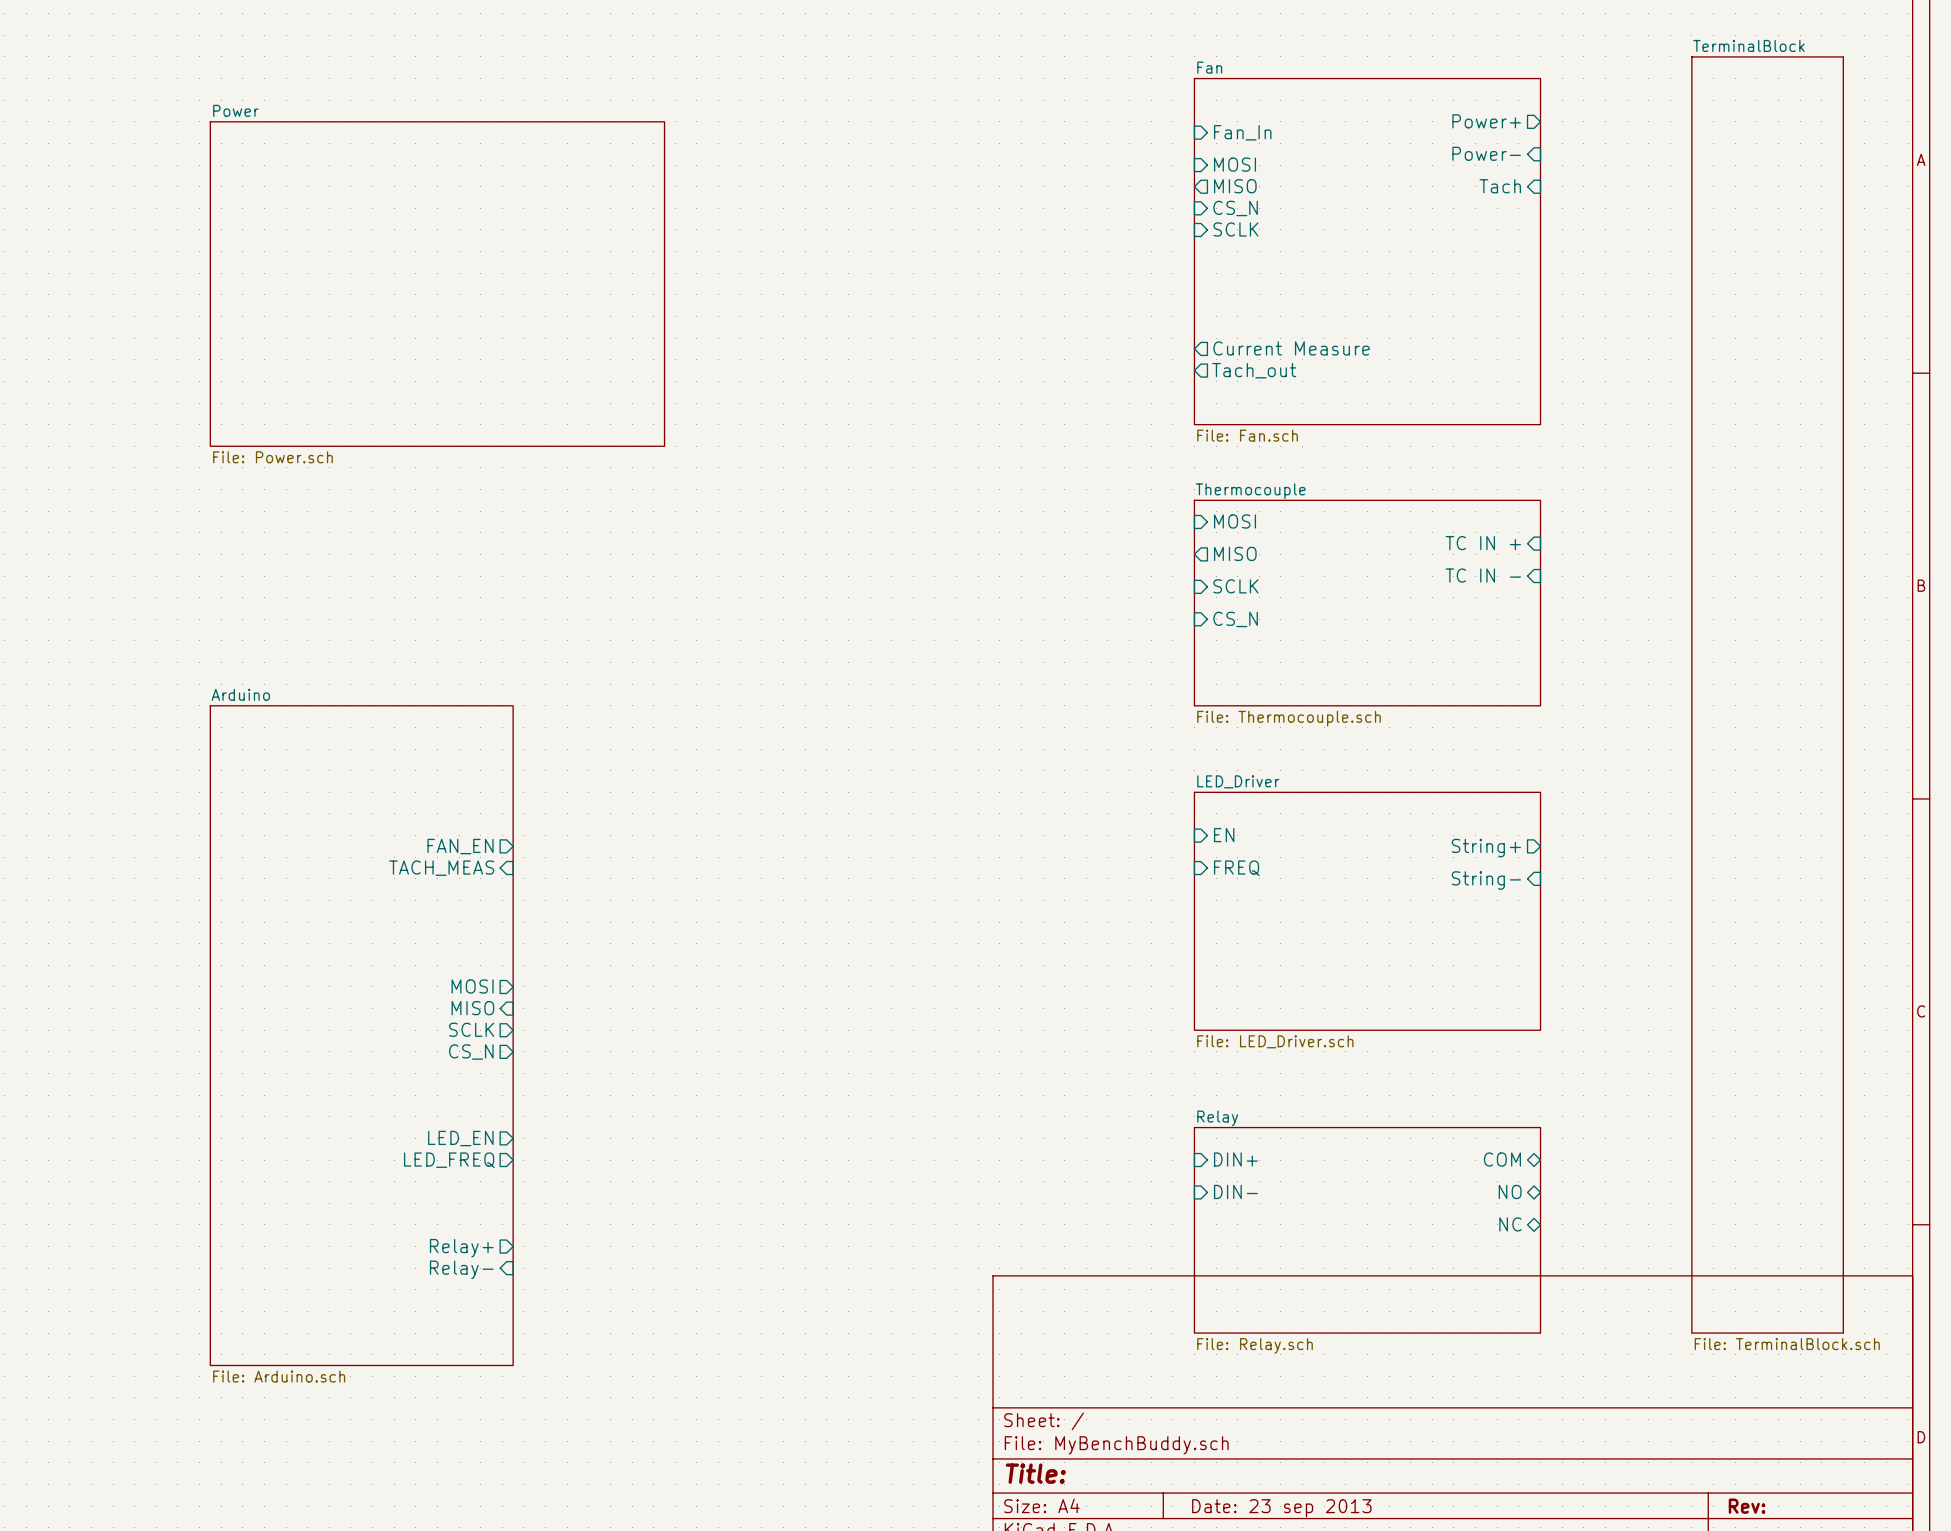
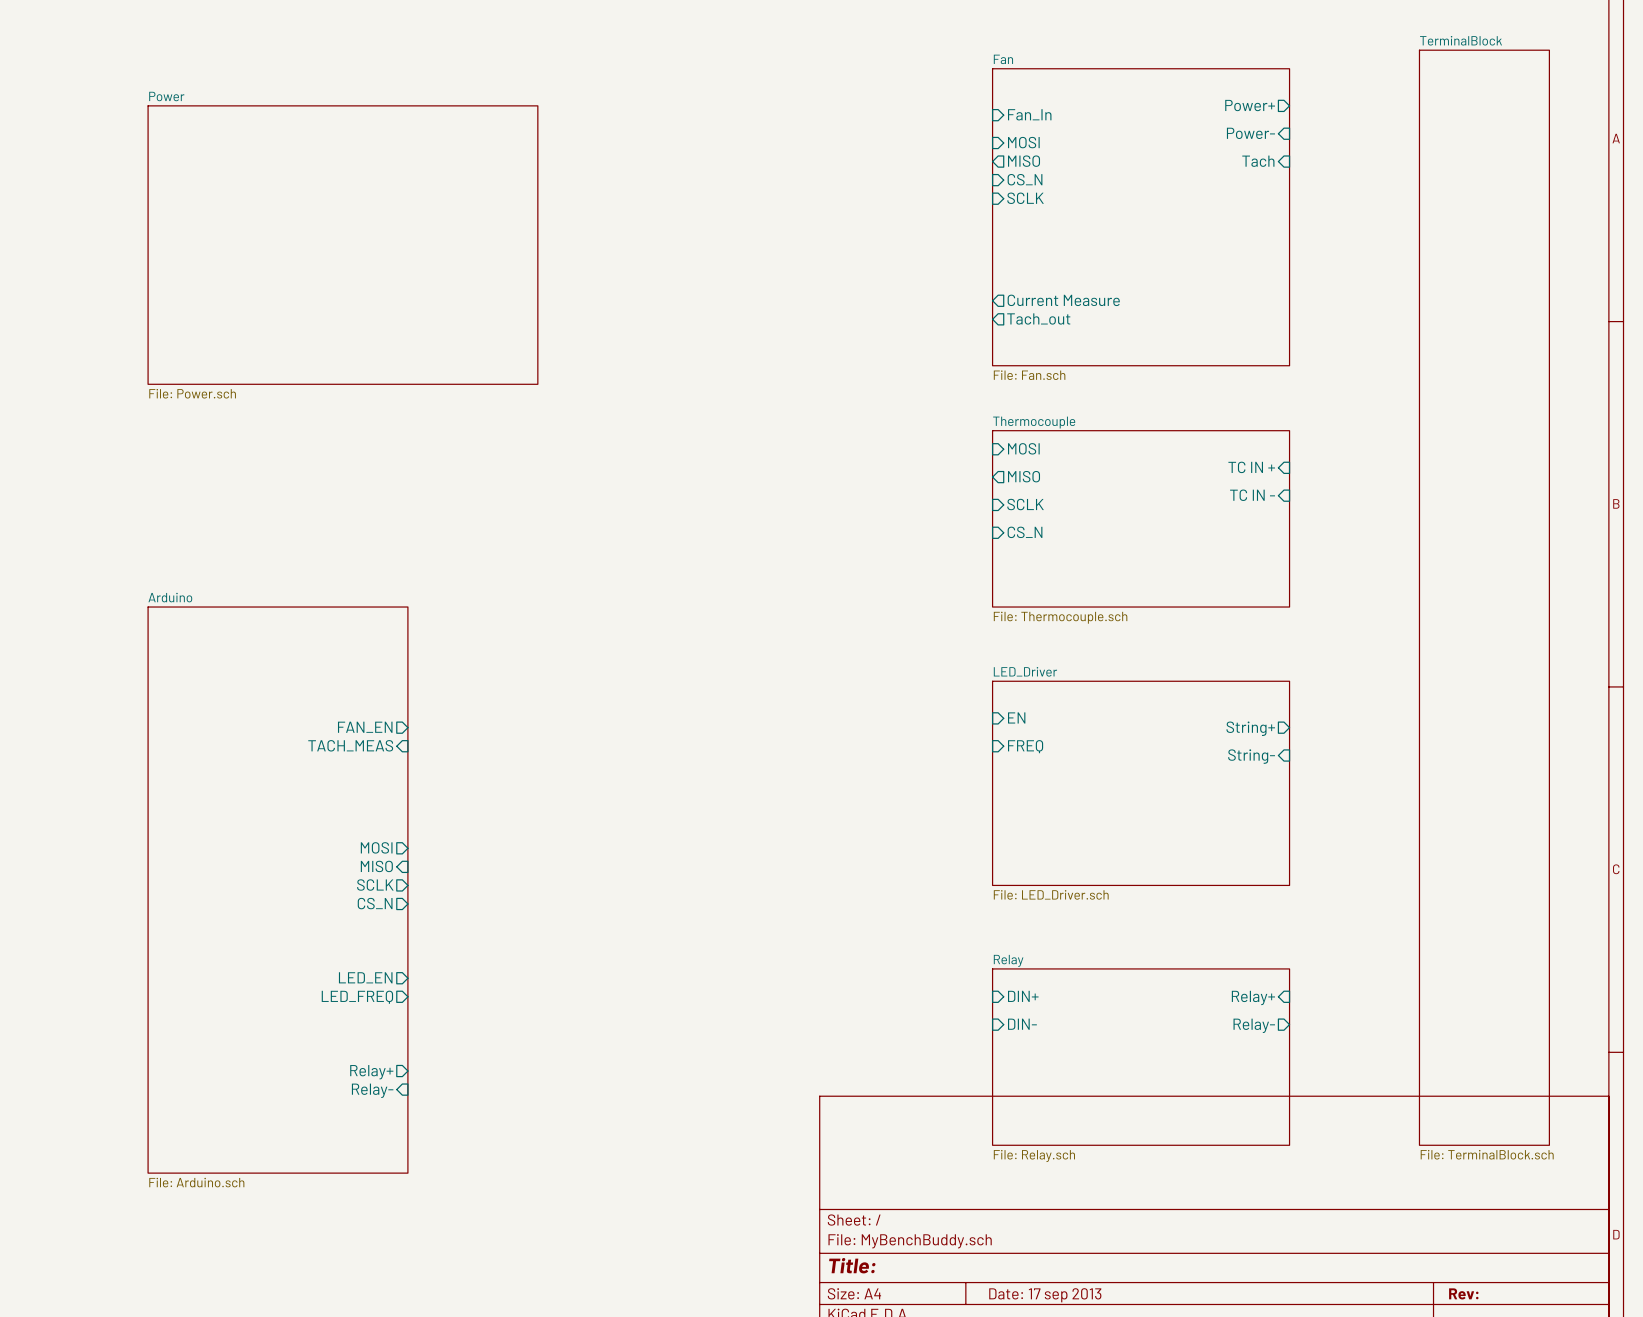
sheet pin shape: bidirectional (1502, 1159) -> input (1253, 997)
sheet pin: COM (1502, 1159) -> Relay+ (1253, 997)
sheet pin shape: bidirectional (1510, 1191) -> output (1254, 1025)
sheet pin: NO (1510, 1191) -> Relay- (1254, 1025)
sheet pin: NC (1510, 1224) -> none
title block: Date: 23 sep 2013 (1281, 1508) -> Date: 17 sep 2013 (1045, 1295)

